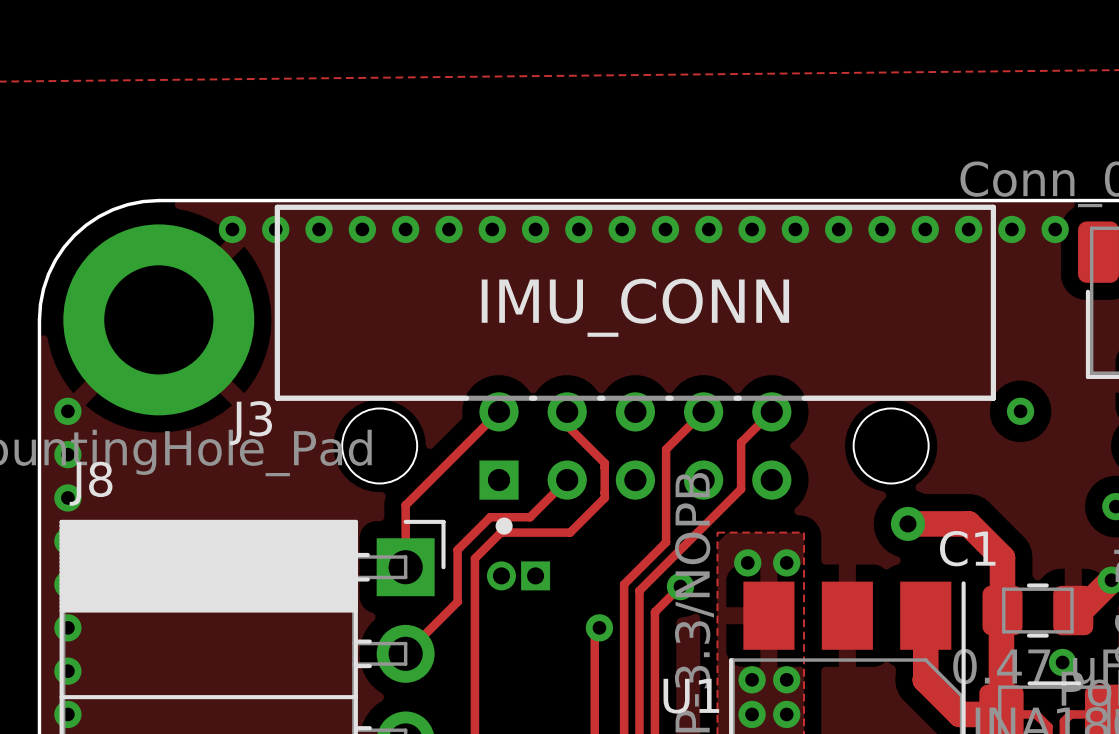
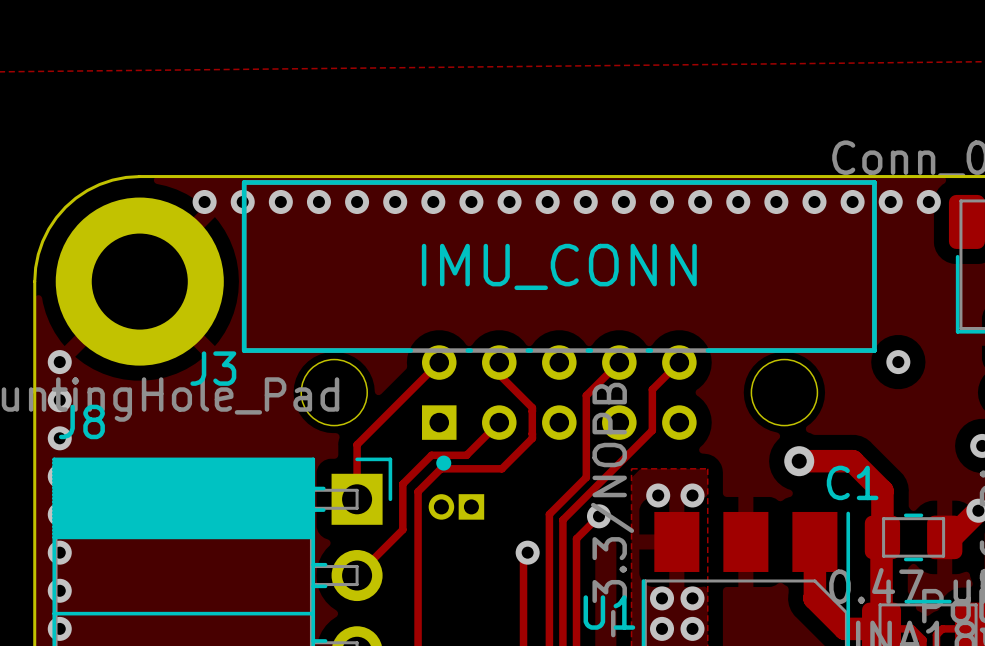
via: (1062, 662) -> none

